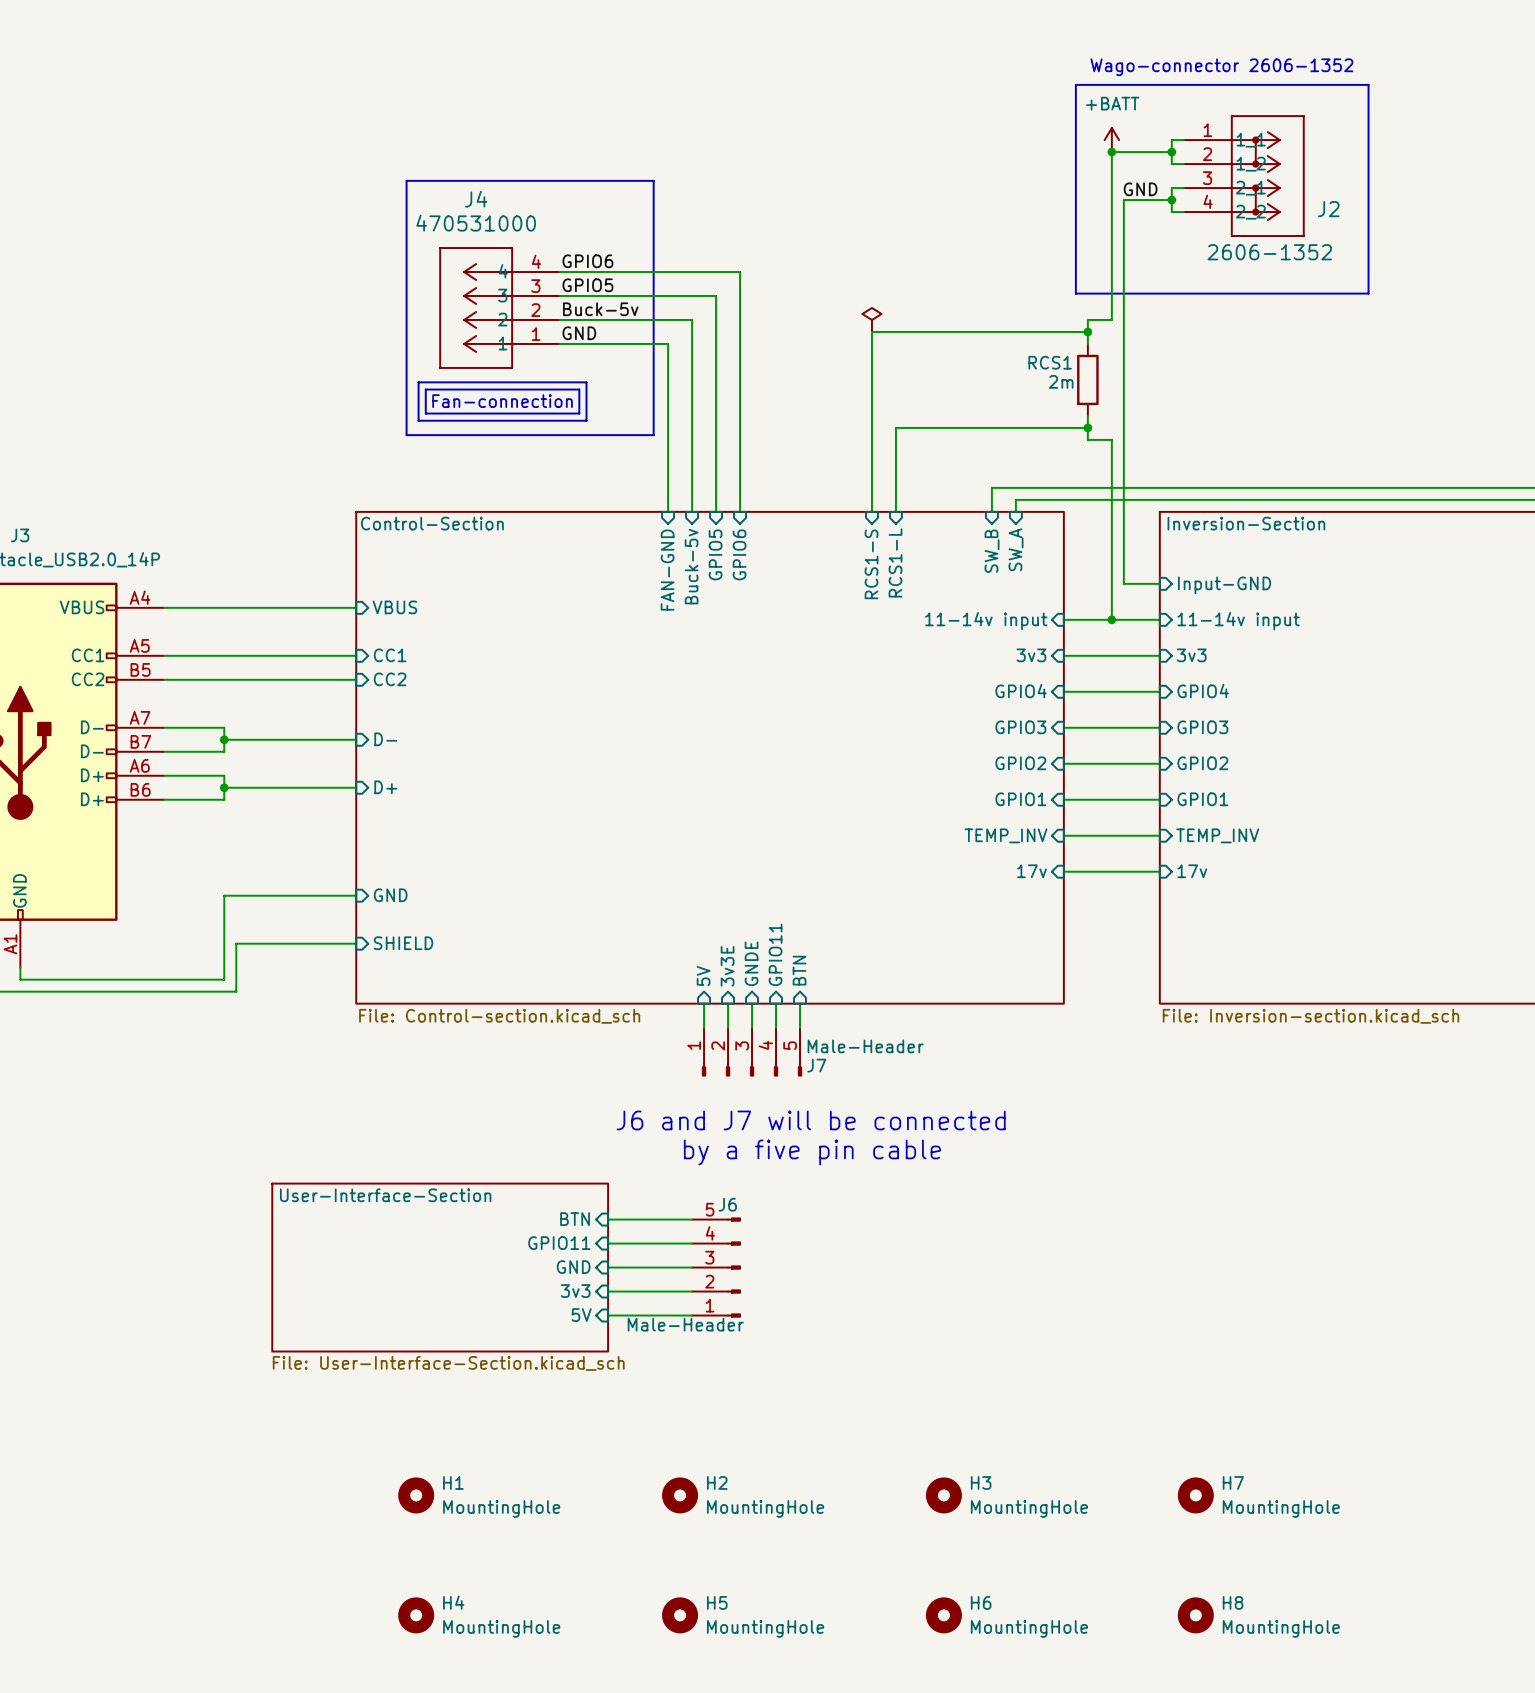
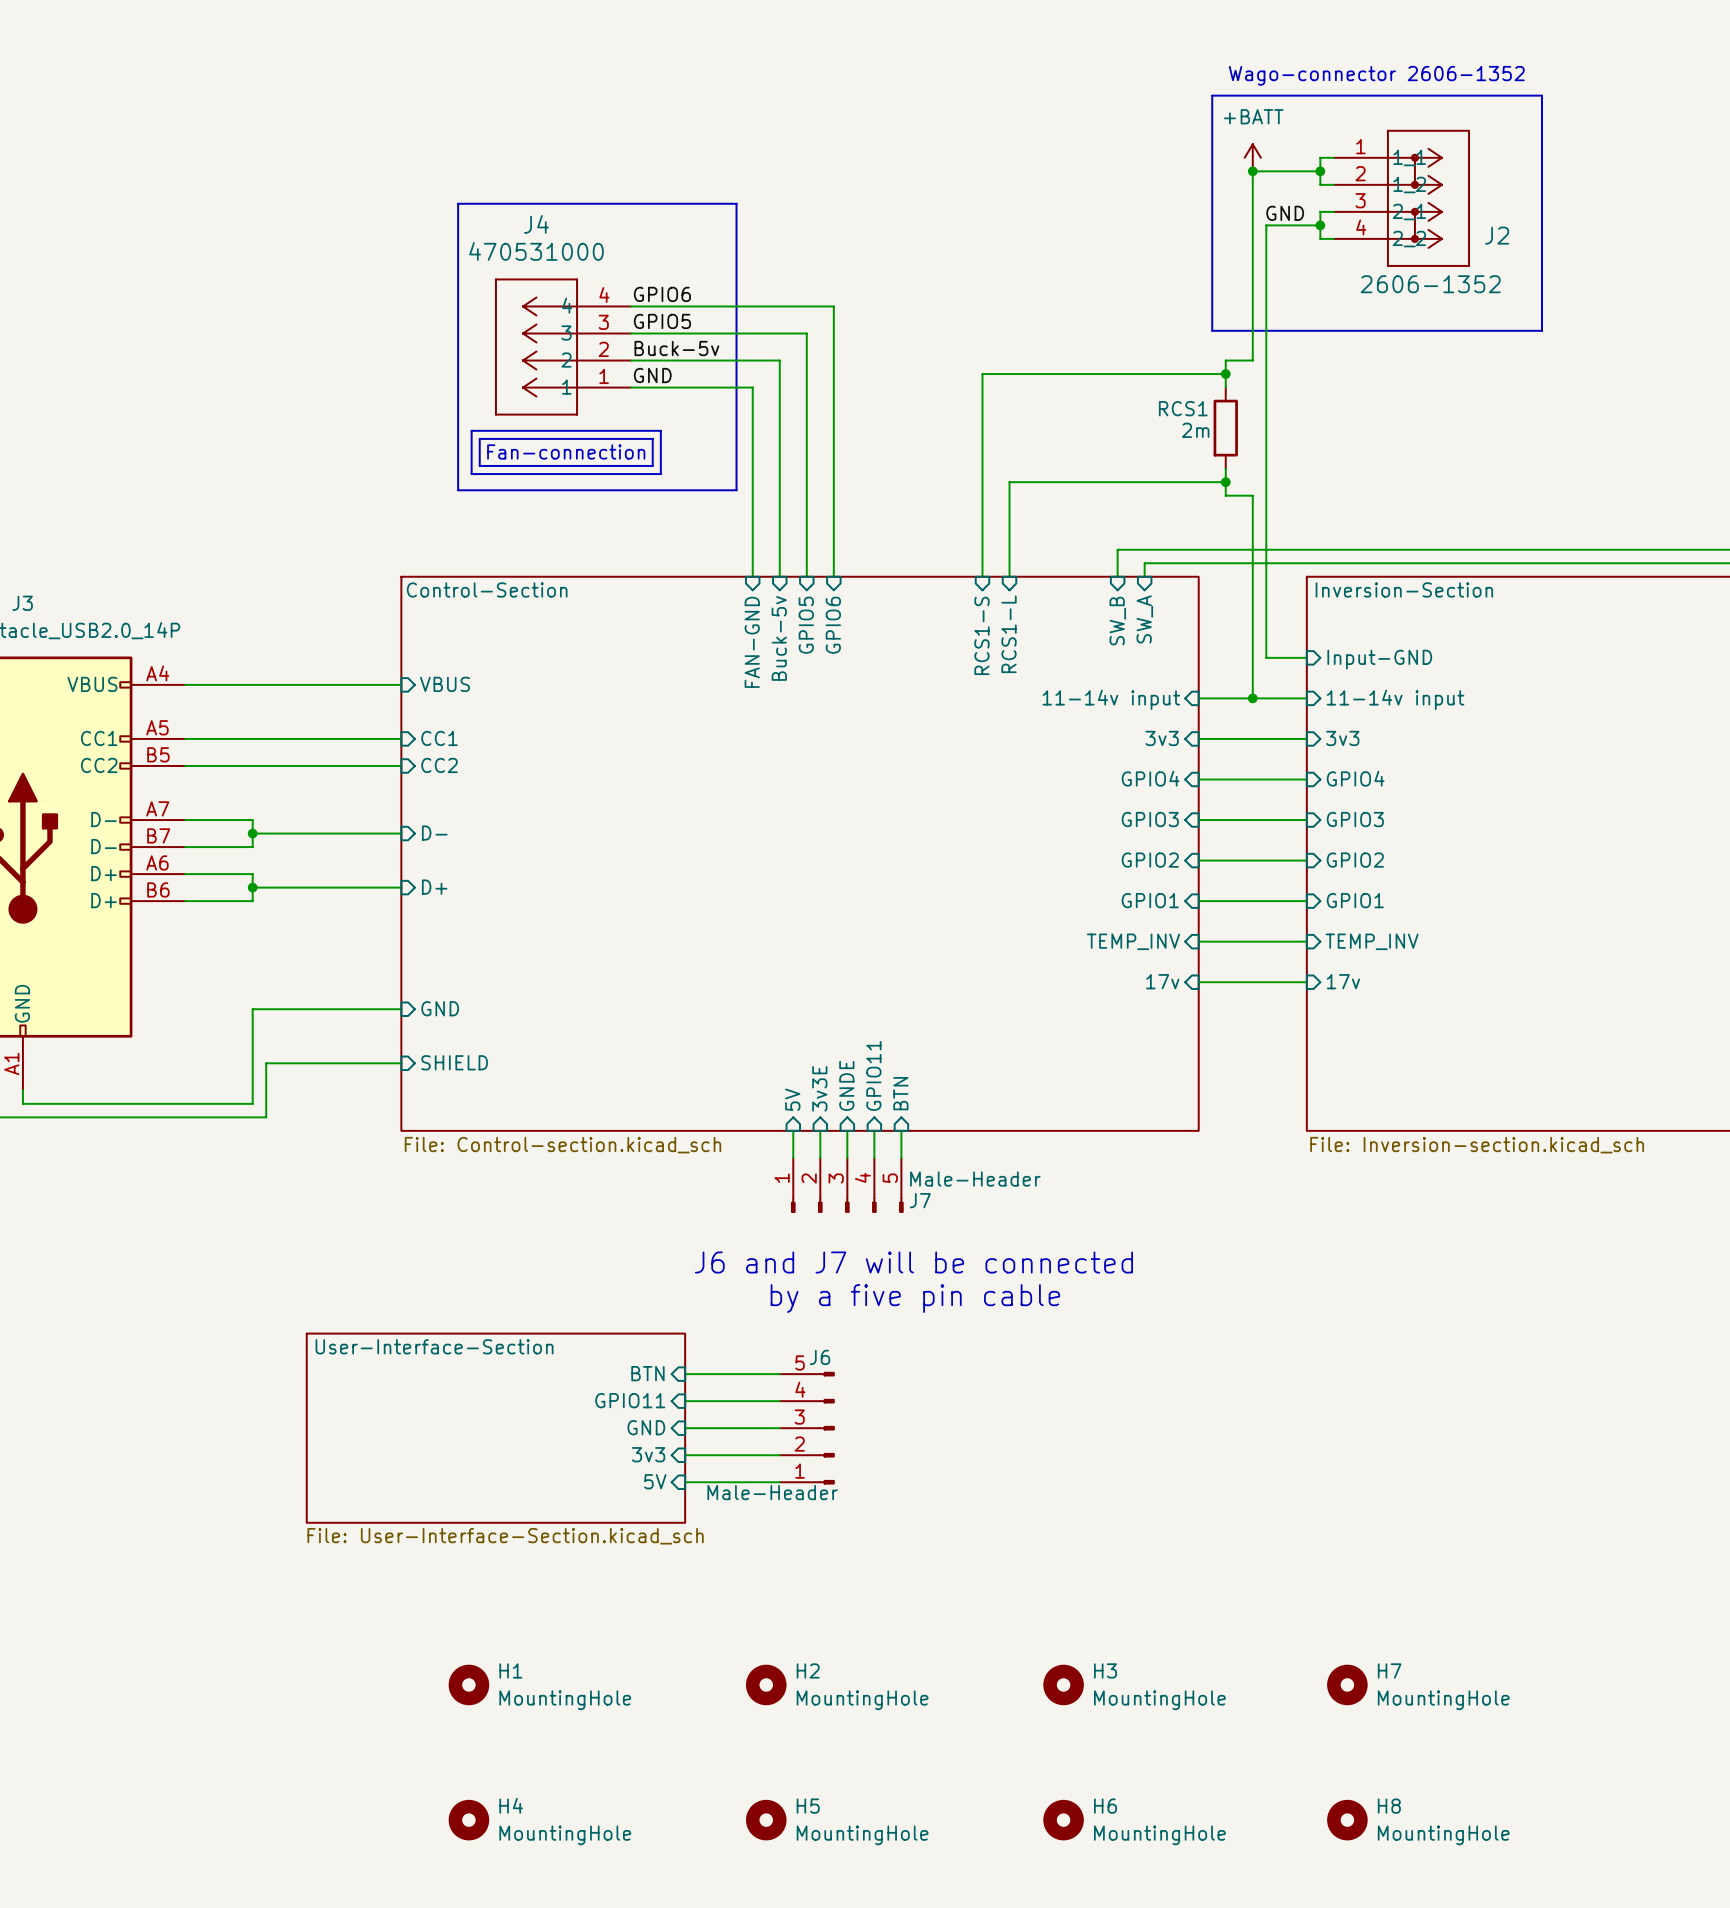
power symbol: (871, 319) -> none

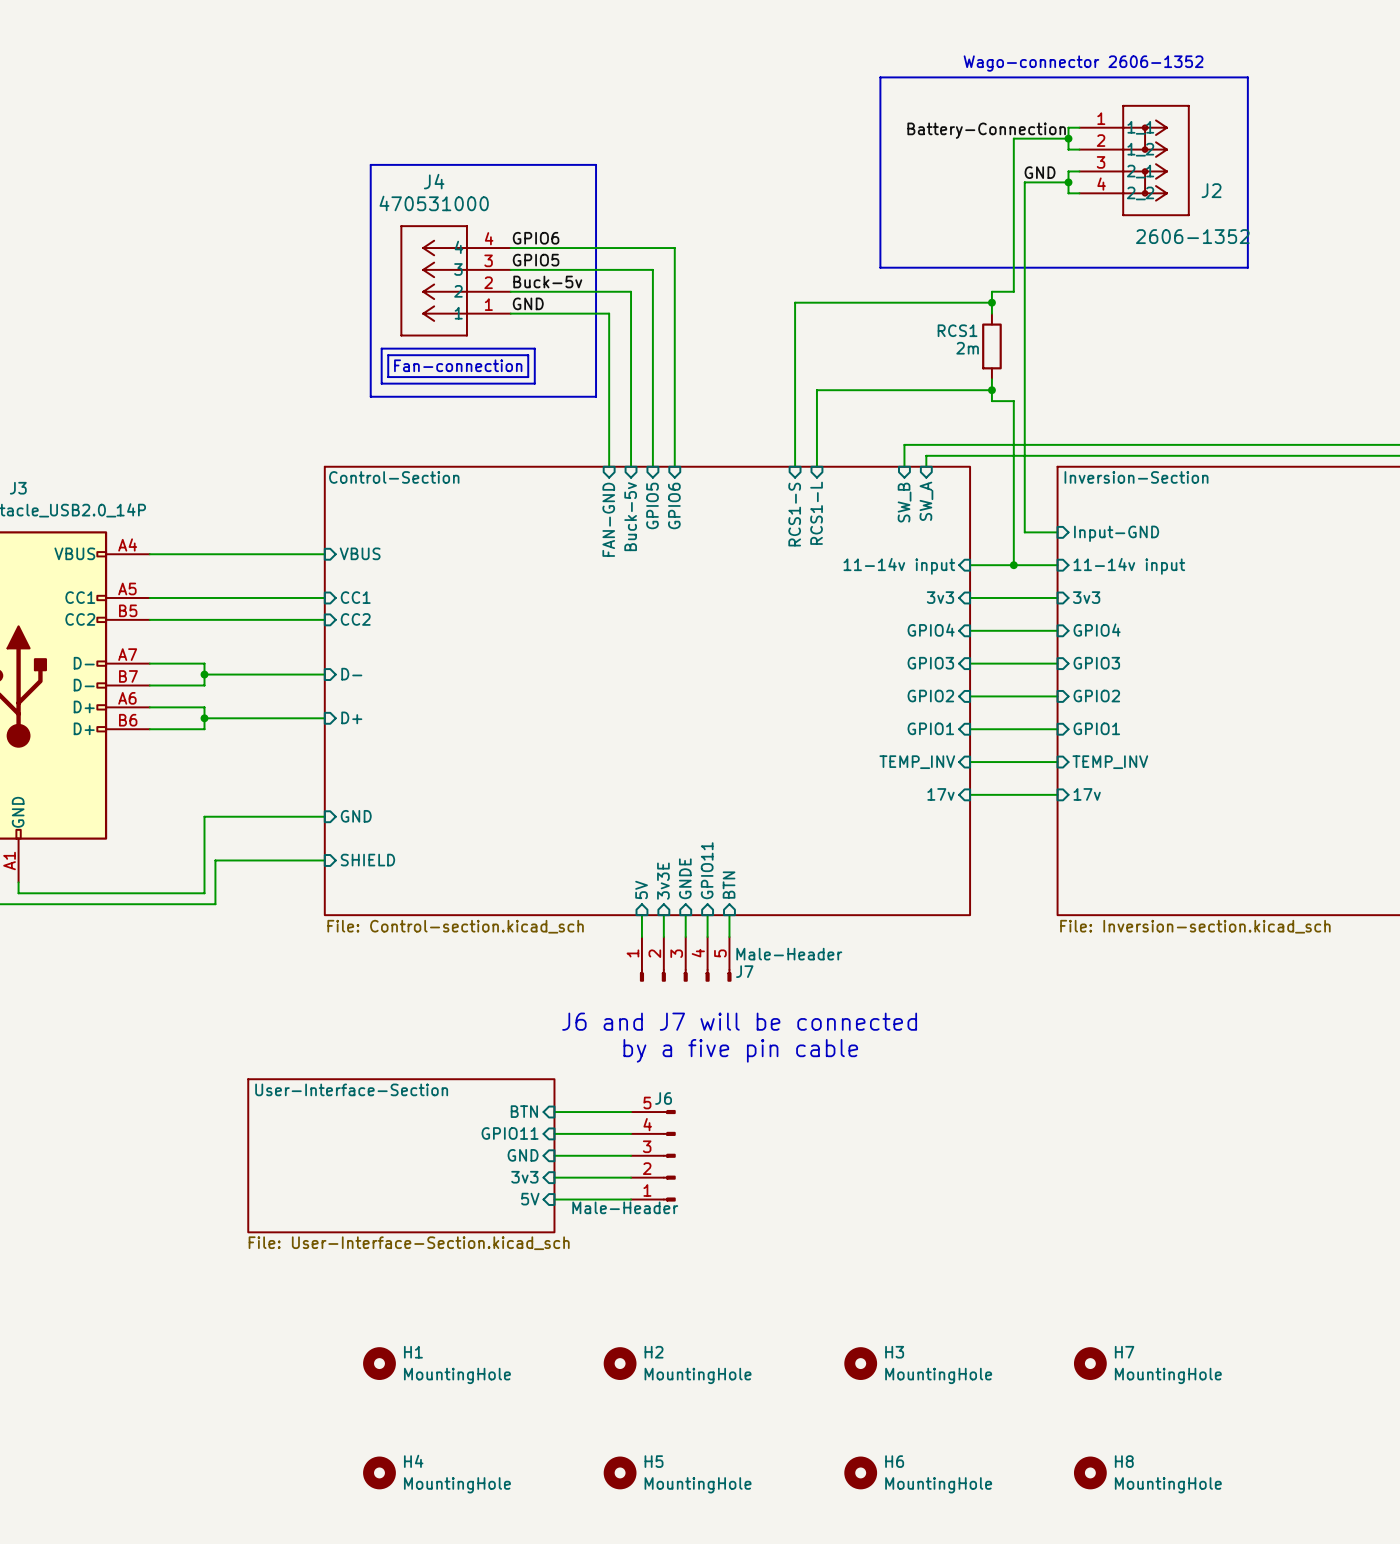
text position: Wago-connector 2606-1352 (1376, 75) -> Wago-connector 2606-1352 (1083, 63)
line: (1212, 95) (1212, 330) -> (981, 77) (880, 77) (880, 267) (981, 267)
power symbol: +BATT (1252, 157) -> none
label: none -> Battery-Connection (986, 130)
junction: (1252, 171) -> none
J2 value position: 2606-1352 (1430, 284) -> 2606-1352 (1192, 236)

